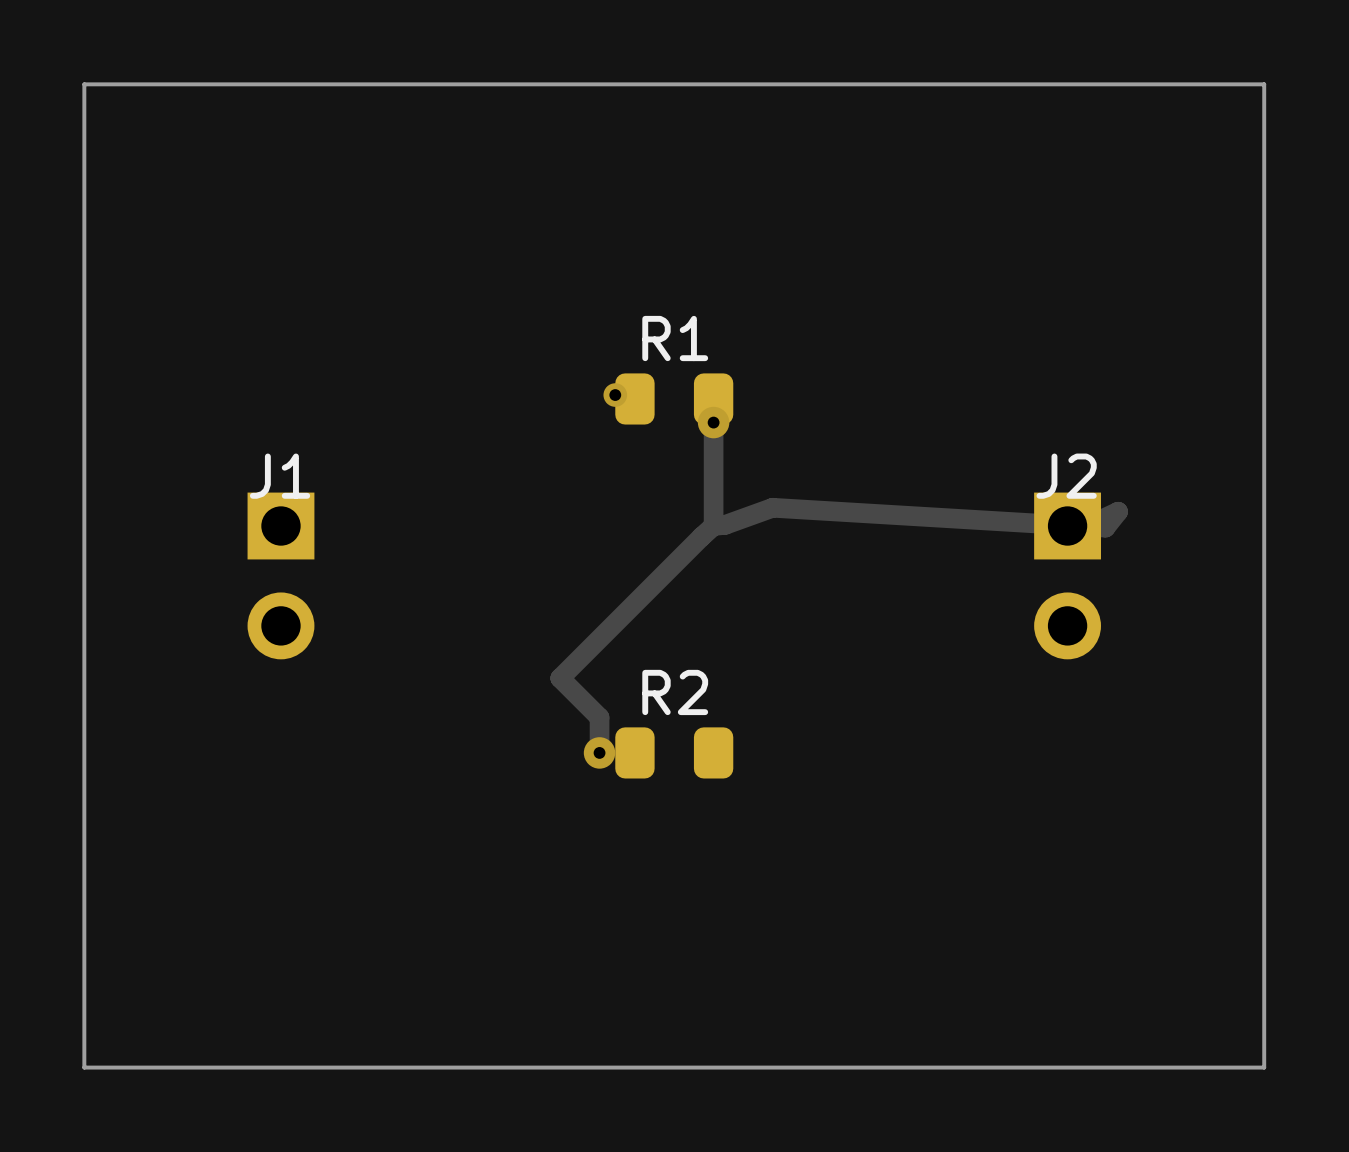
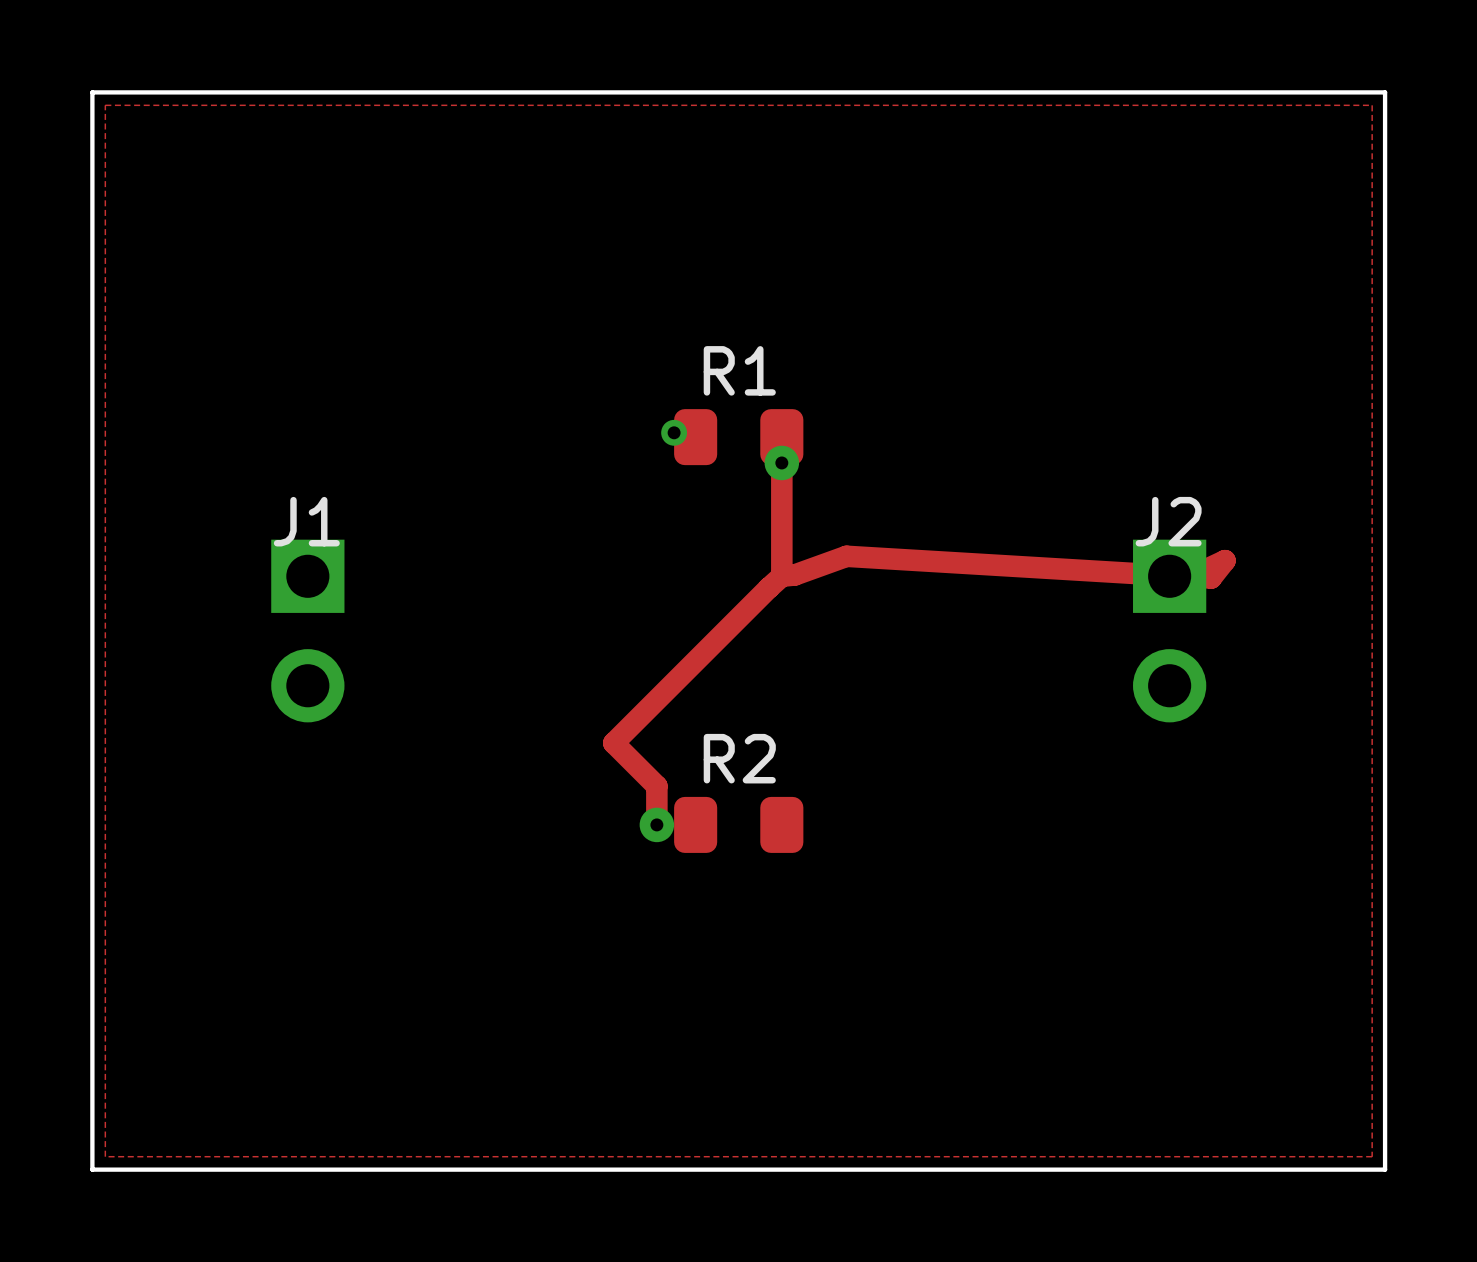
zone outline: none -> (105, 105) (1372, 105) (1372, 1156) (105, 1156) (105, 105)

